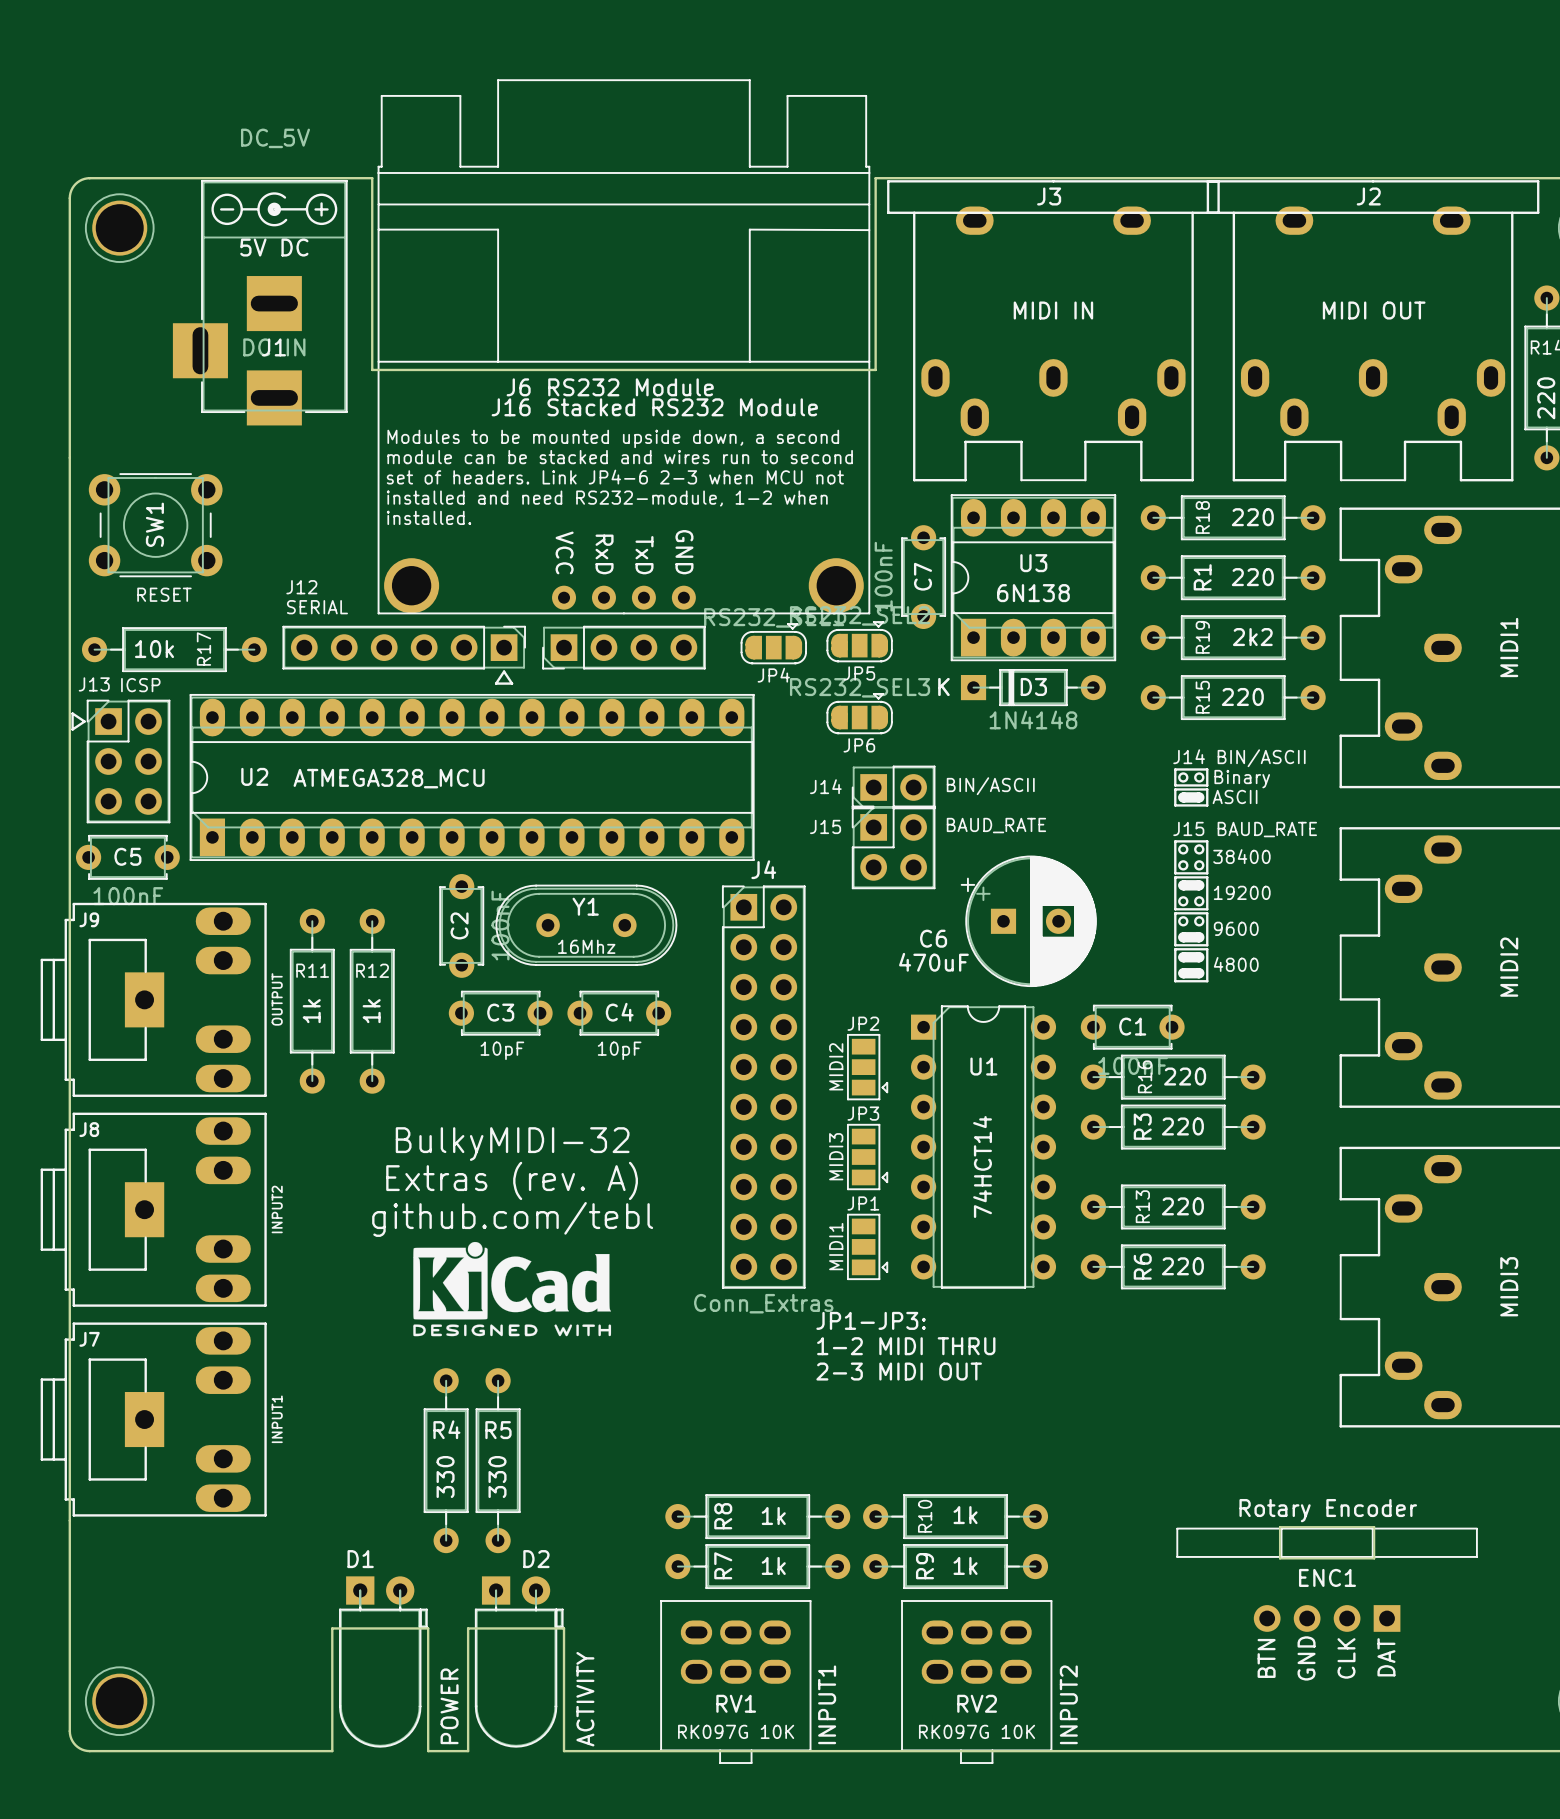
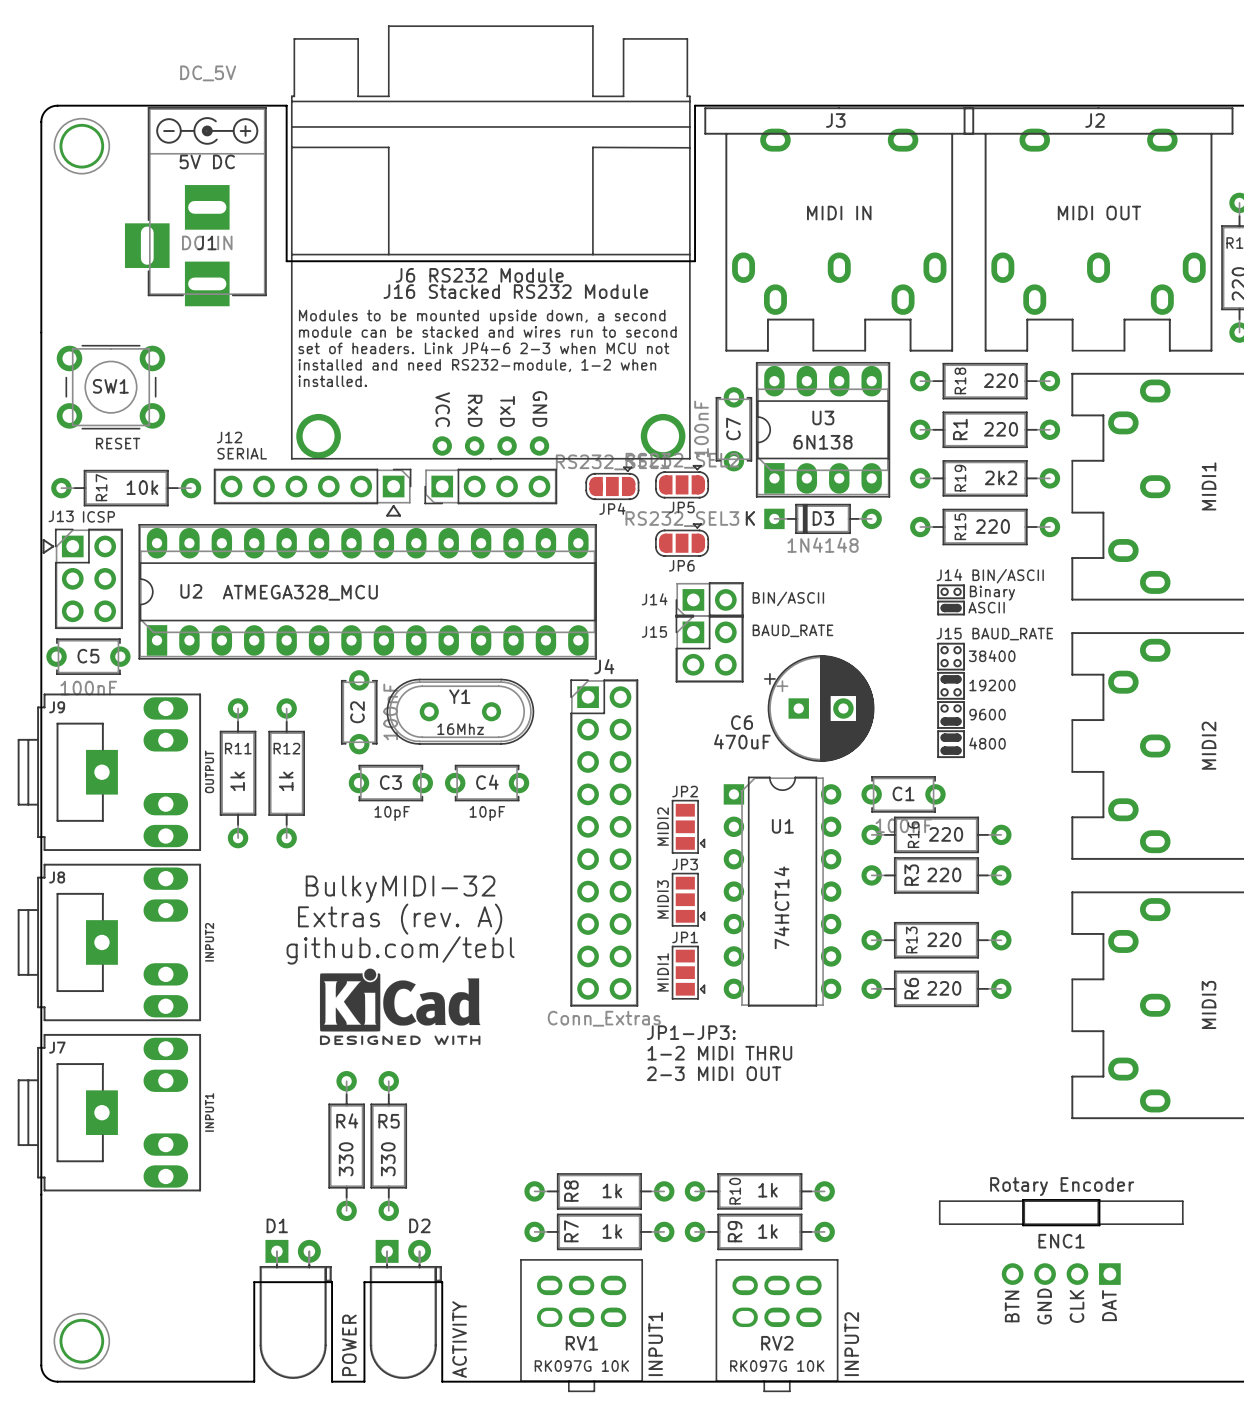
SW1 name rotation: 0° (154, 524) -> 90° clockwise (110, 386)
R17 value position: 10k (154, 649) -> 10k (142, 487)
R17 name position: R17 (203, 649) -> R17 (101, 487)

